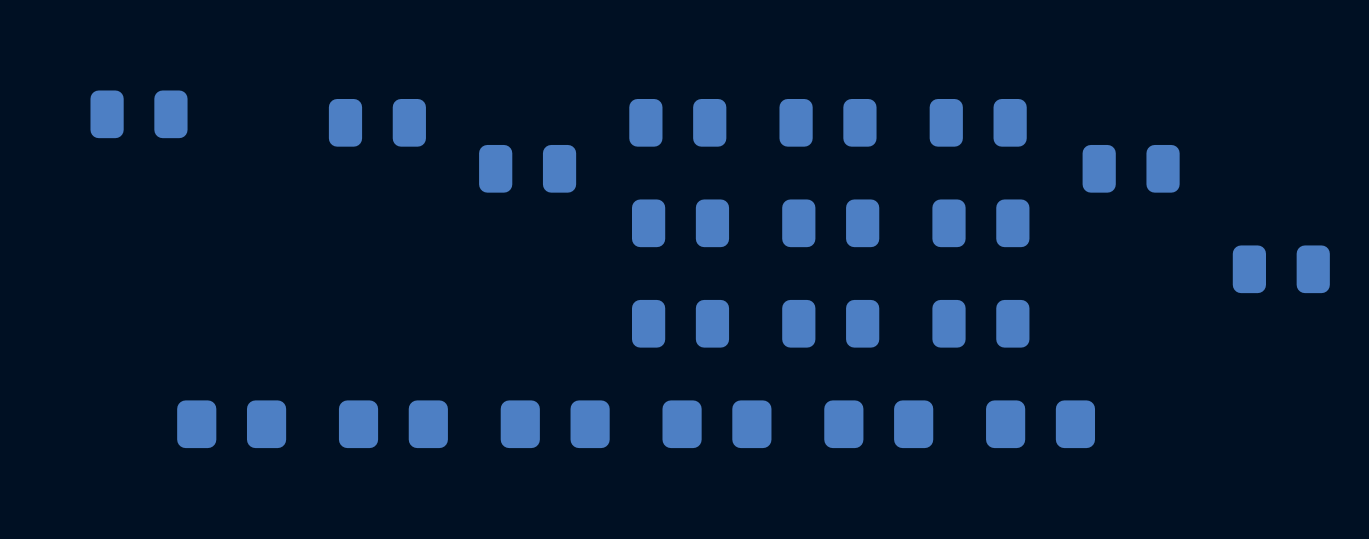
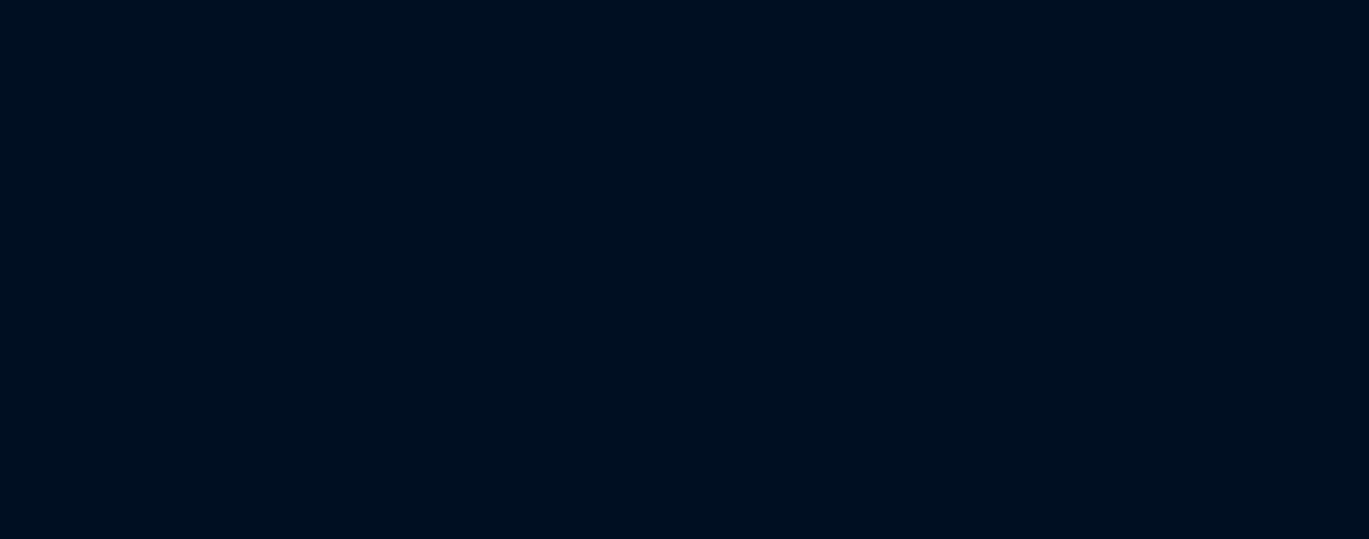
part: (139, 114) -> none
part: (377, 122) -> none
part: (677, 122) -> none
part: (828, 122) -> none
part: (978, 122) -> none
part: (527, 168) -> none
part: (1131, 168) -> none
part: (680, 223) -> none
part: (830, 223) -> none
part: (980, 223) -> none
part: (1281, 269) -> none
part: (680, 323) -> none
part: (830, 323) -> none
part: (980, 323) -> none
part: (231, 424) -> none
part: (393, 424) -> none
part: (555, 424) -> none
part: (716, 424) -> none
part: (878, 424) -> none
part: (1040, 424) -> none

